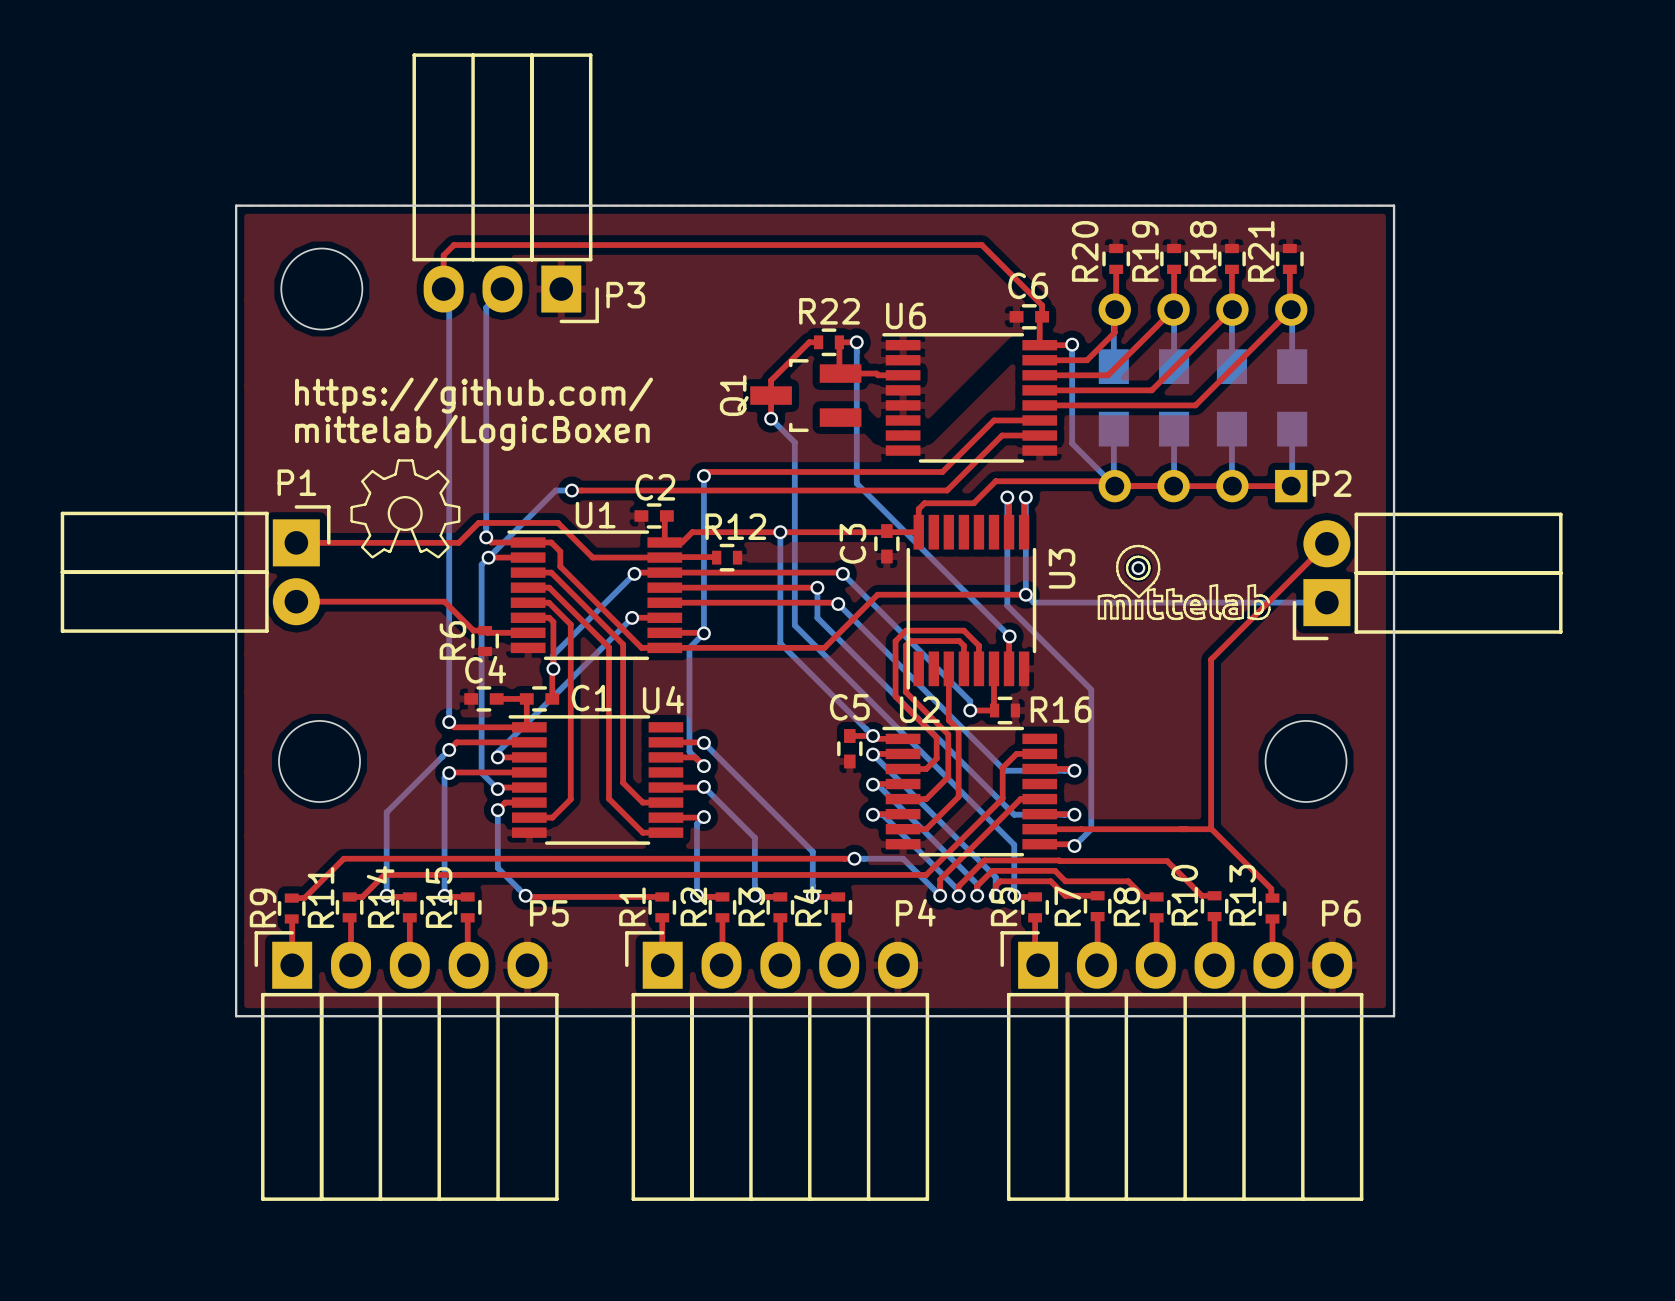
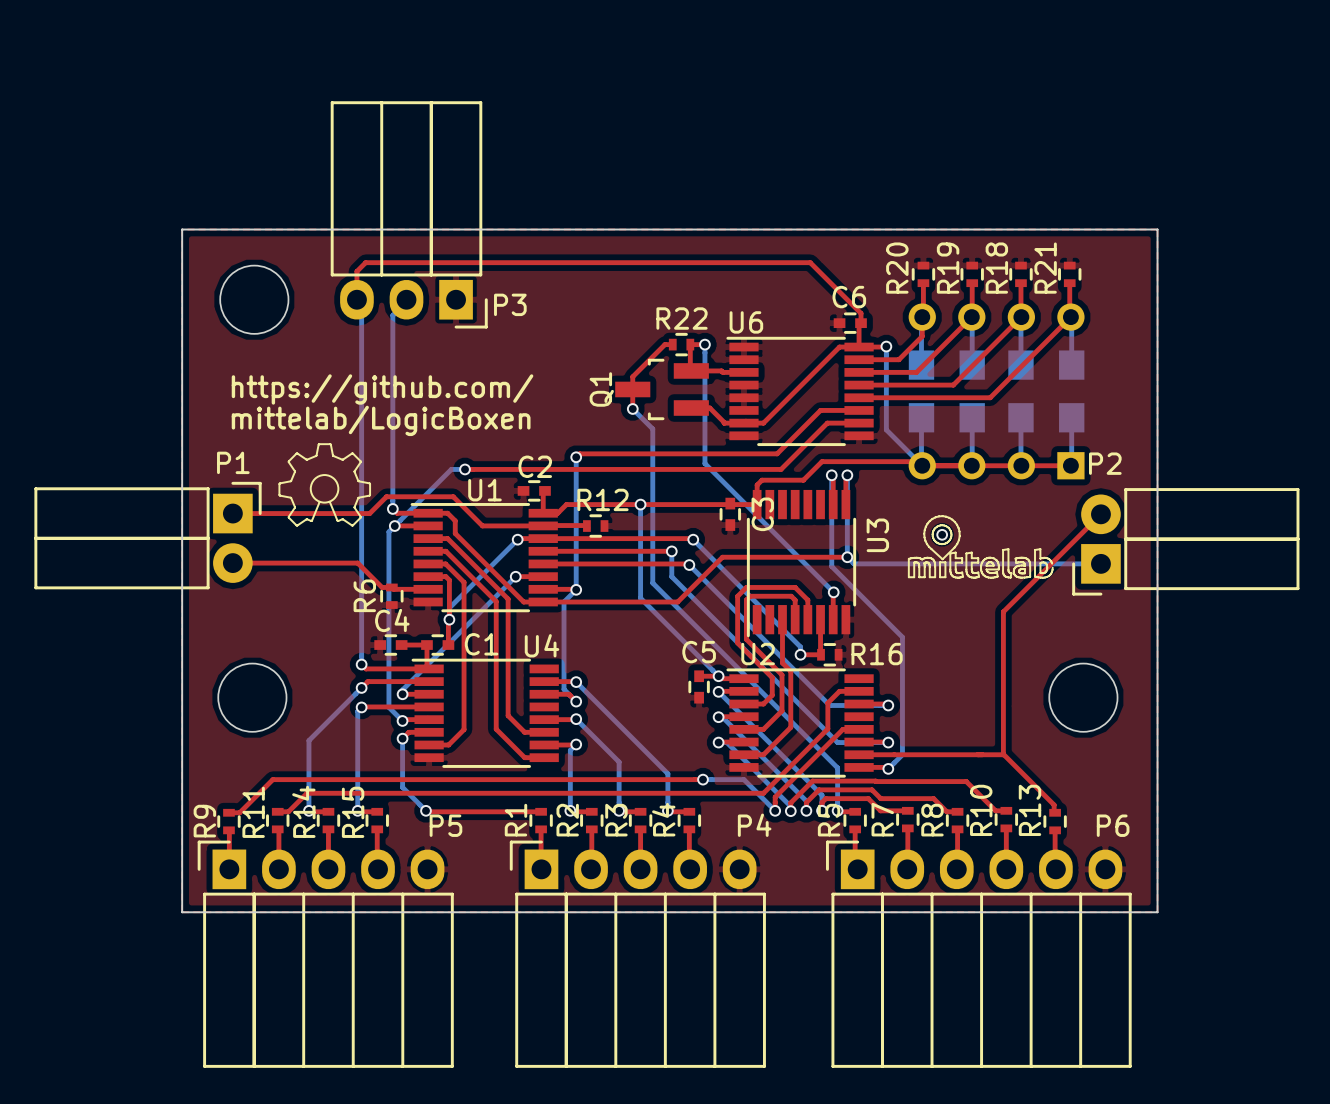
top track: none -> (859, 347) (839, 347) (763, 423) (724, 423) (709, 408) (691, 408)
C3 name position: C3 (852, 543) -> C3 (762, 514)

